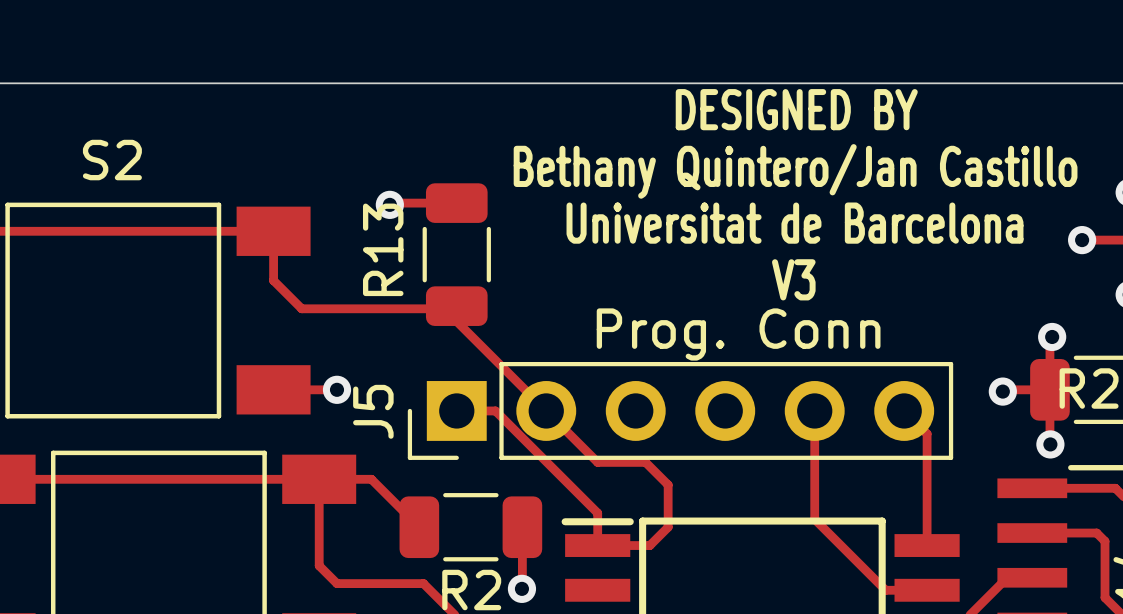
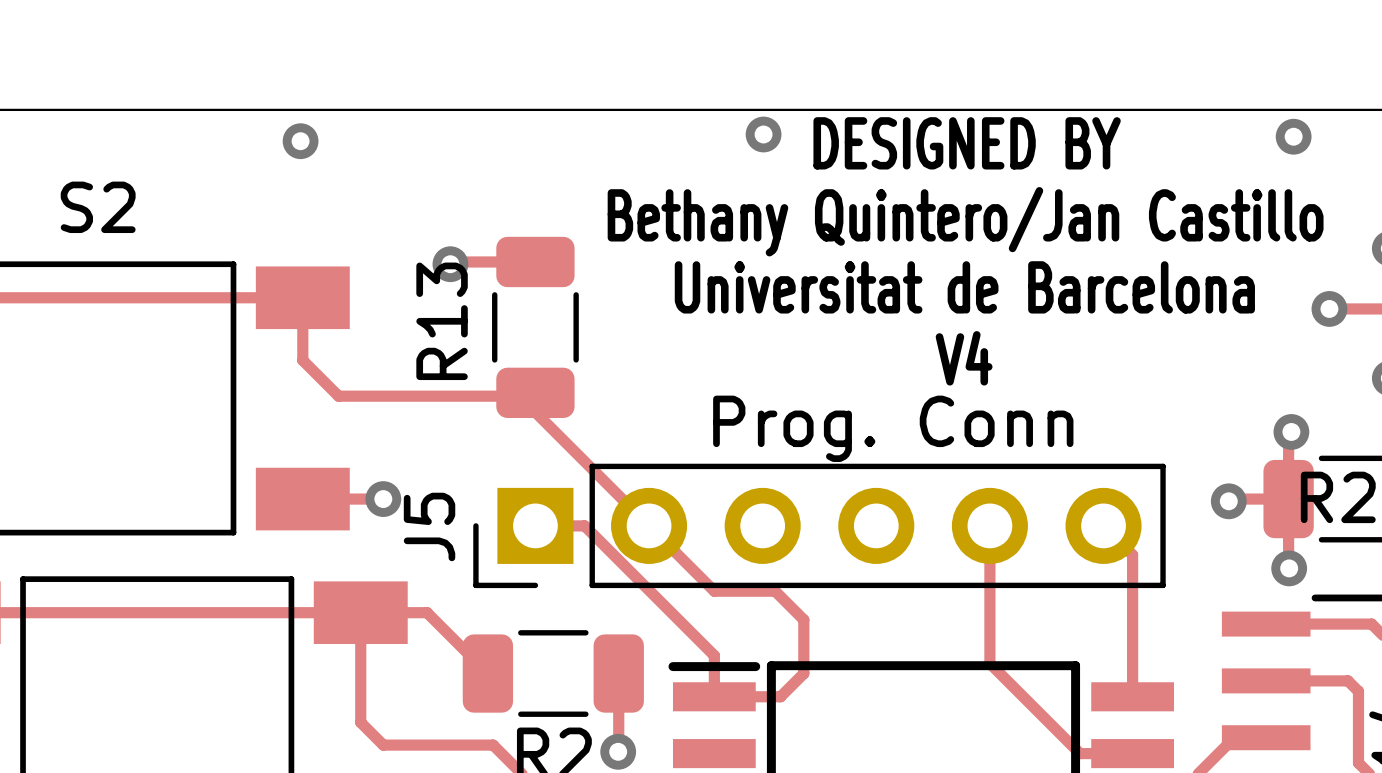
via: none -> (763, 134)
via: none -> (1293, 136)
via: none -> (300, 141)
text: V3 (793, 279) -> V4 (964, 358)

